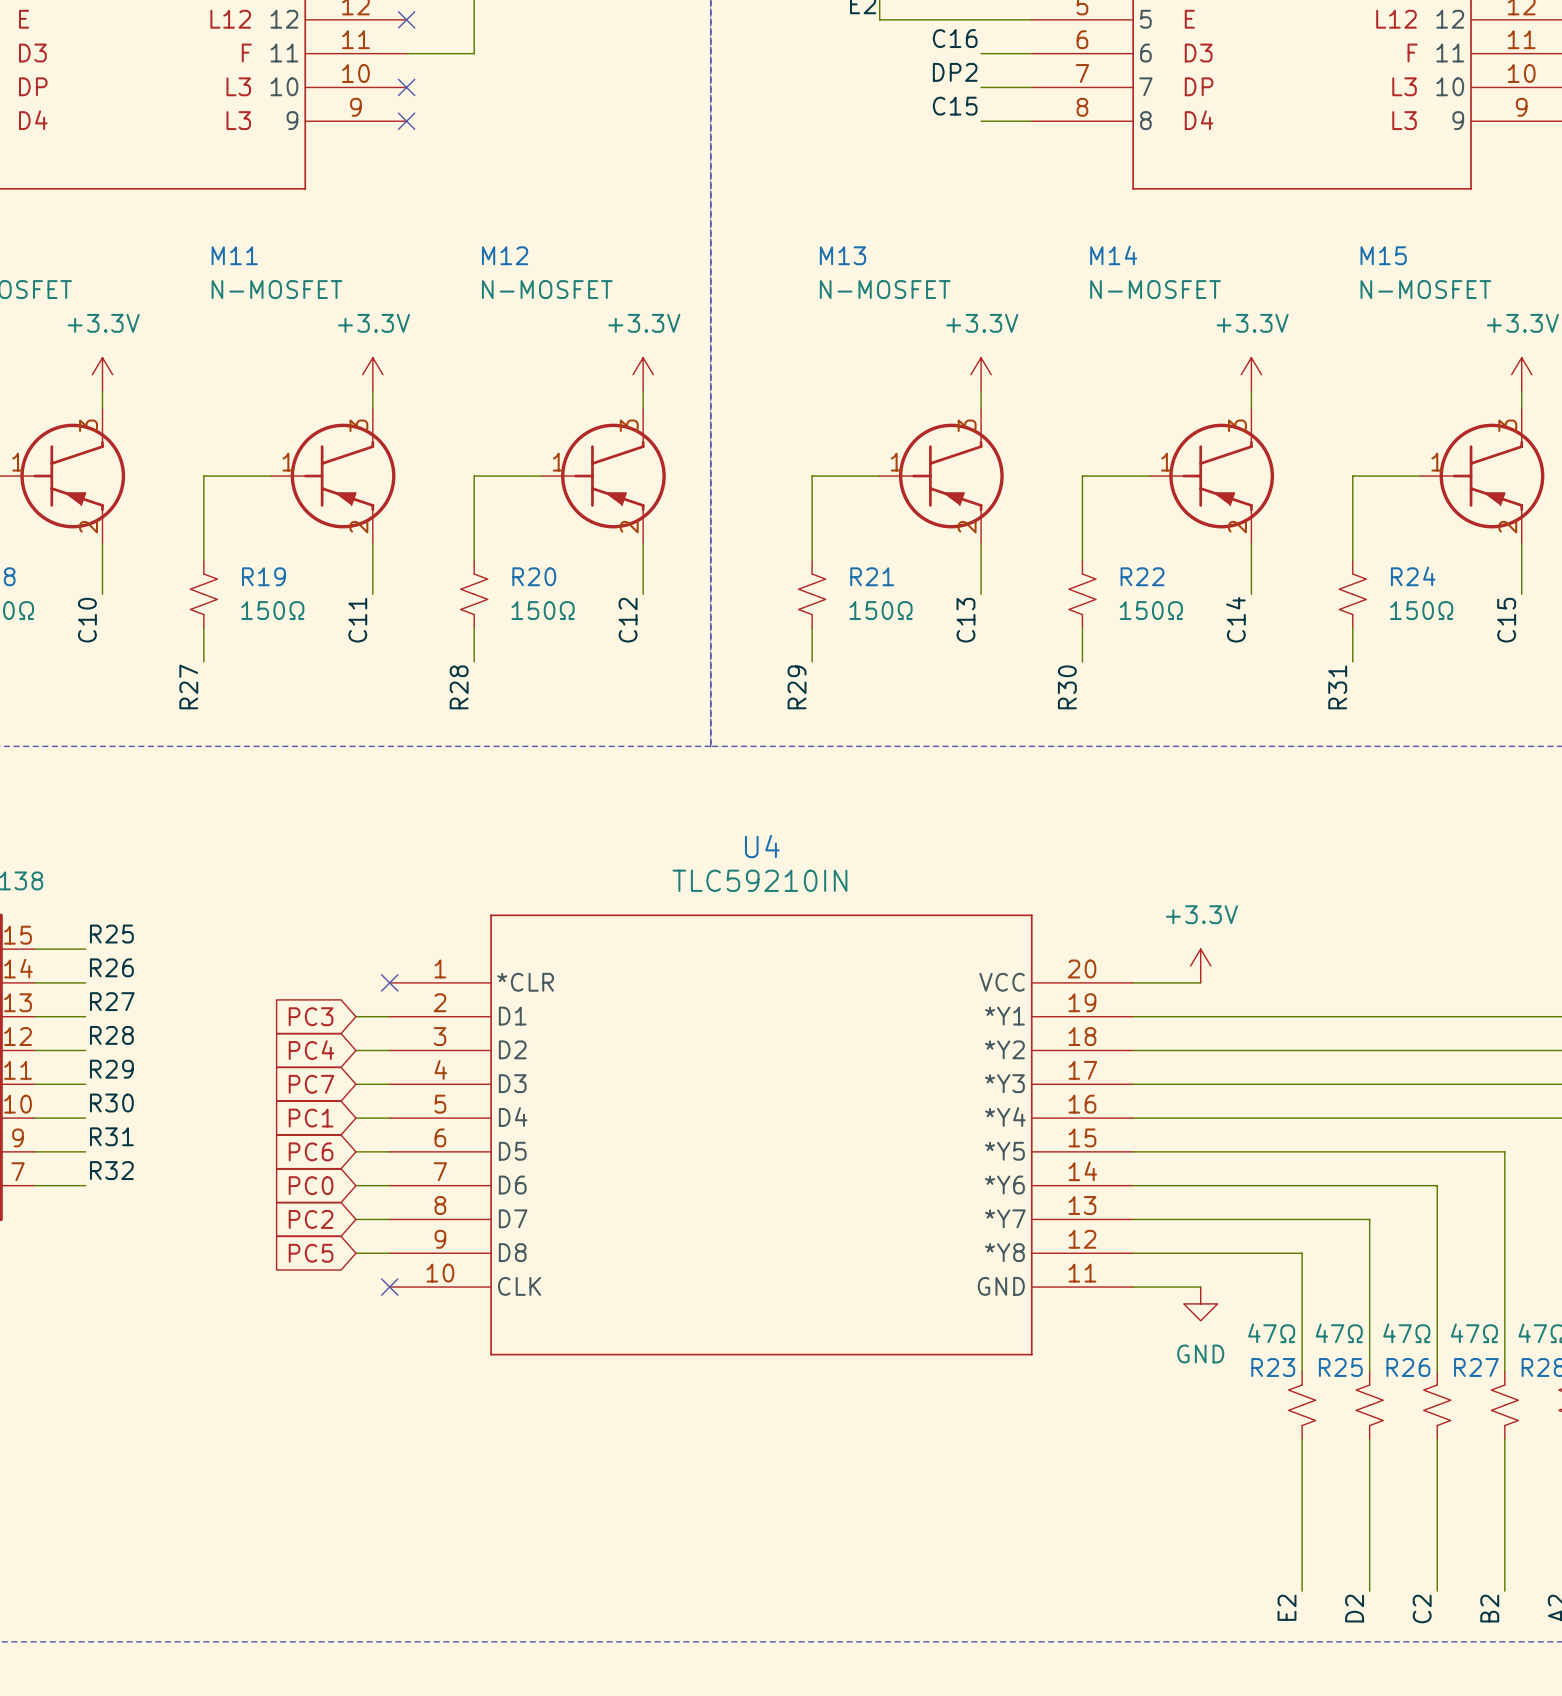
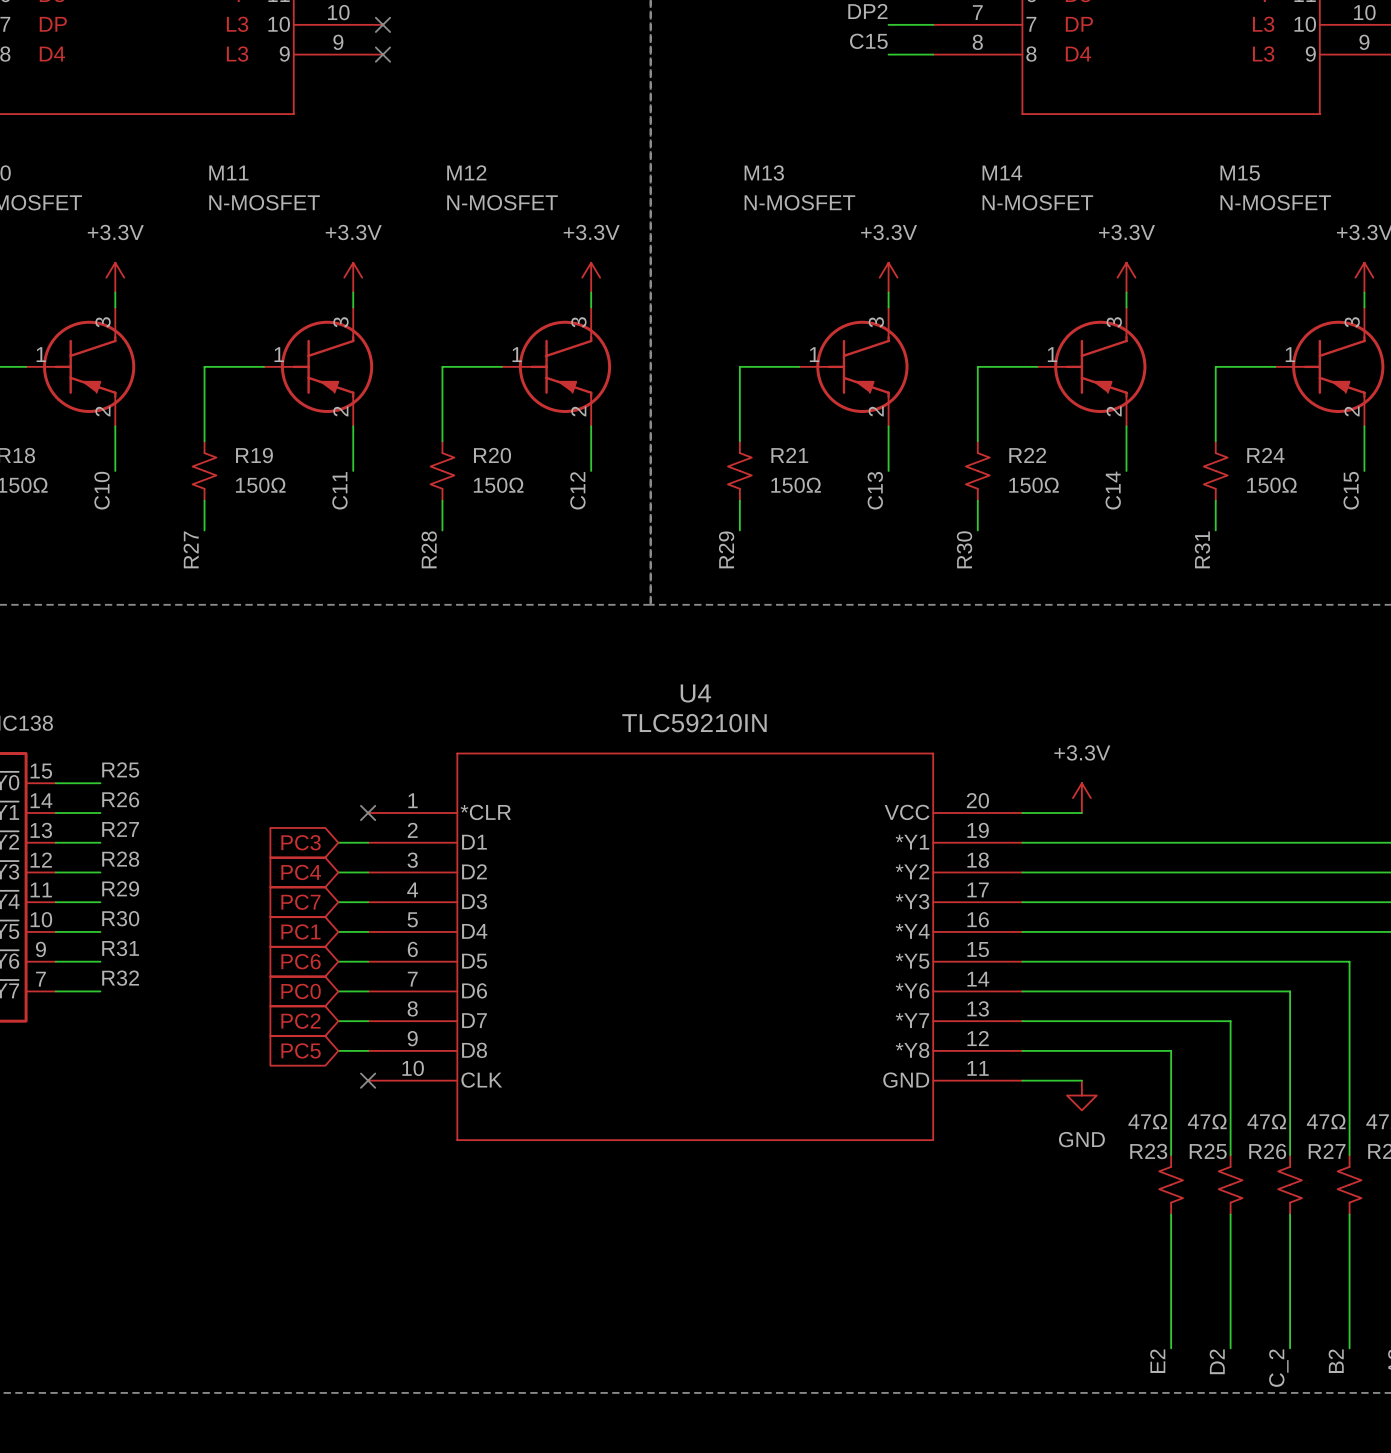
label: C2 (1422, 1608) -> C_2 (1278, 1368)

